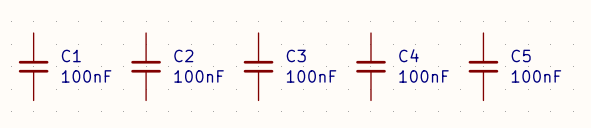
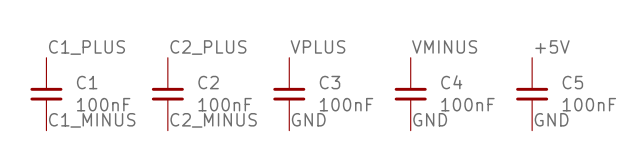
label: none -> VPLUS (317, 46)
label: none -> VMINUS (444, 46)
label: none -> +5V (552, 46)
label: none -> C1_PLUS (86, 47)
label: none -> C2_PLUS (208, 47)
label: none -> C1_MINUS (92, 120)
label: none -> C2_MINUS (213, 120)
label: none -> GND (308, 119)
label: none -> GND (430, 119)
label: none -> GND (551, 119)

